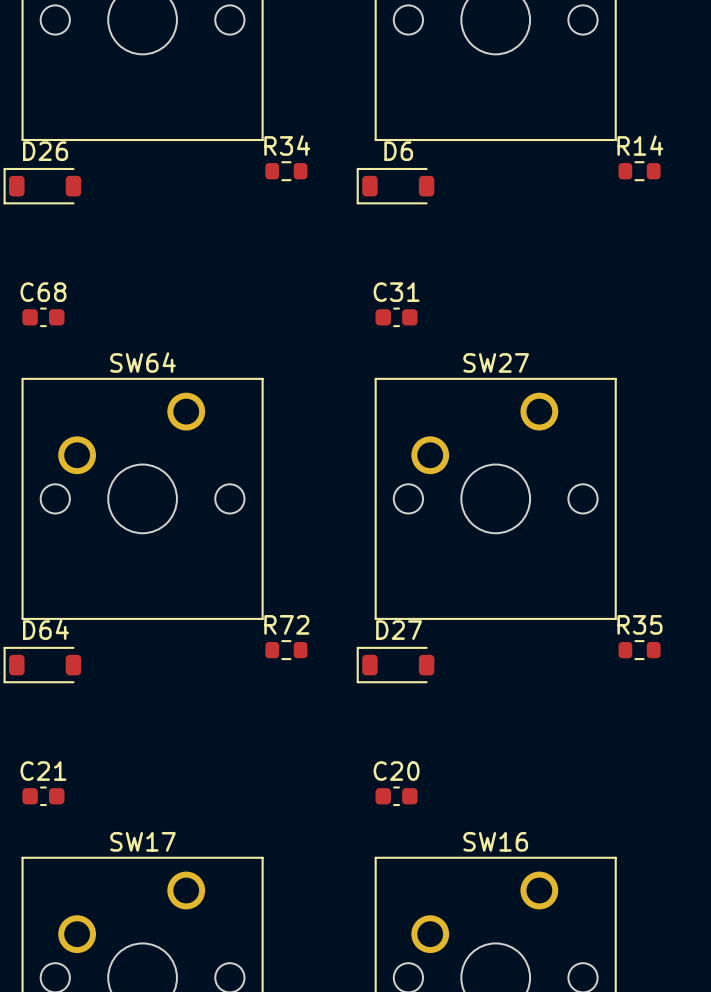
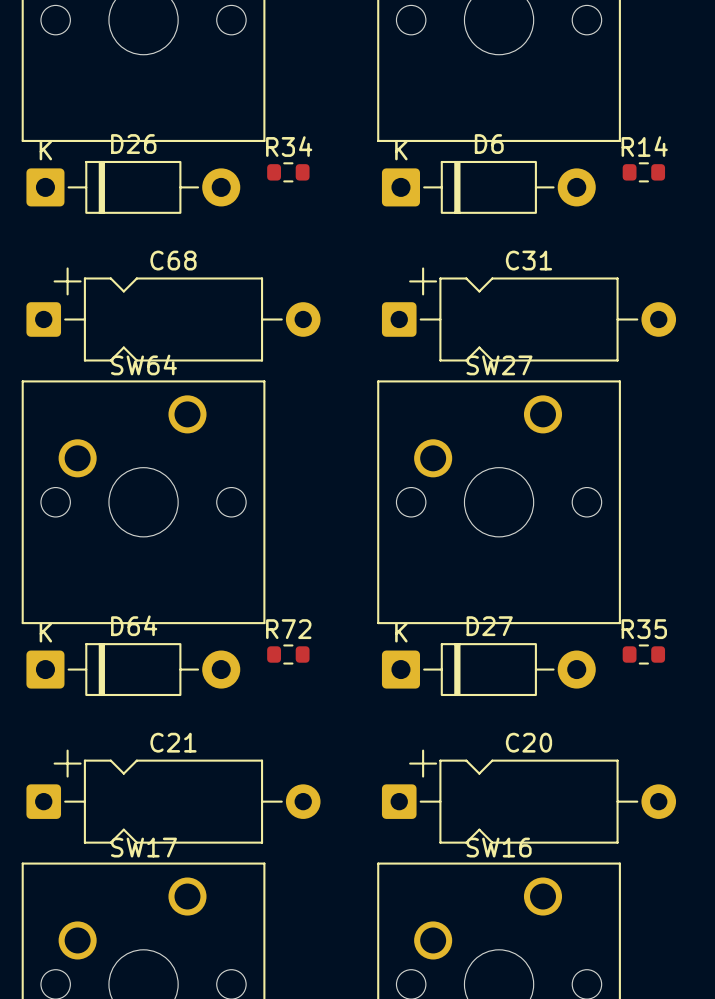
D26 footprint: [3, 167, 82, 205] -> [26, 160, 241, 214]
D6 footprint: [356, 167, 435, 205] -> [381, 160, 596, 214]
C68 footprint: [22, 307, 65, 328] -> [26, 267, 321, 362]
C31 footprint: [375, 307, 418, 328] -> [381, 267, 677, 362]
D64 footprint: [3, 646, 82, 684] -> [26, 643, 241, 697]
D27 footprint: [356, 646, 435, 684] -> [381, 643, 596, 697]
C21 footprint: [22, 786, 65, 807] -> [26, 749, 321, 844]
C20 footprint: [375, 786, 418, 807] -> [381, 749, 677, 844]

